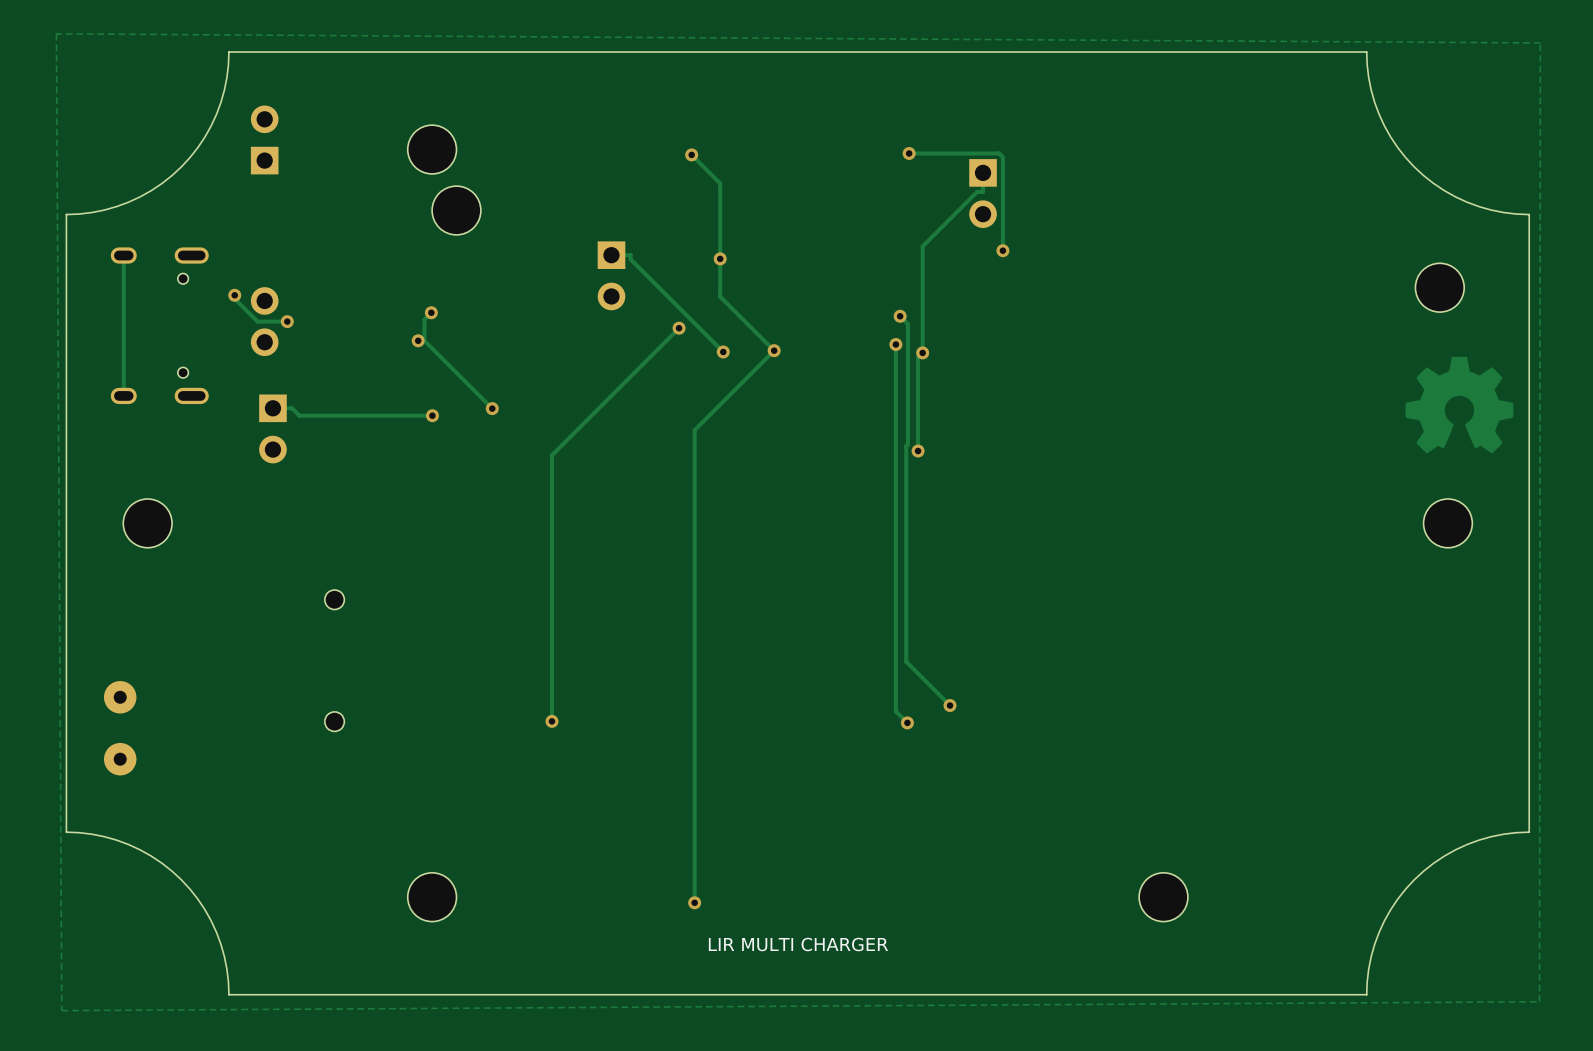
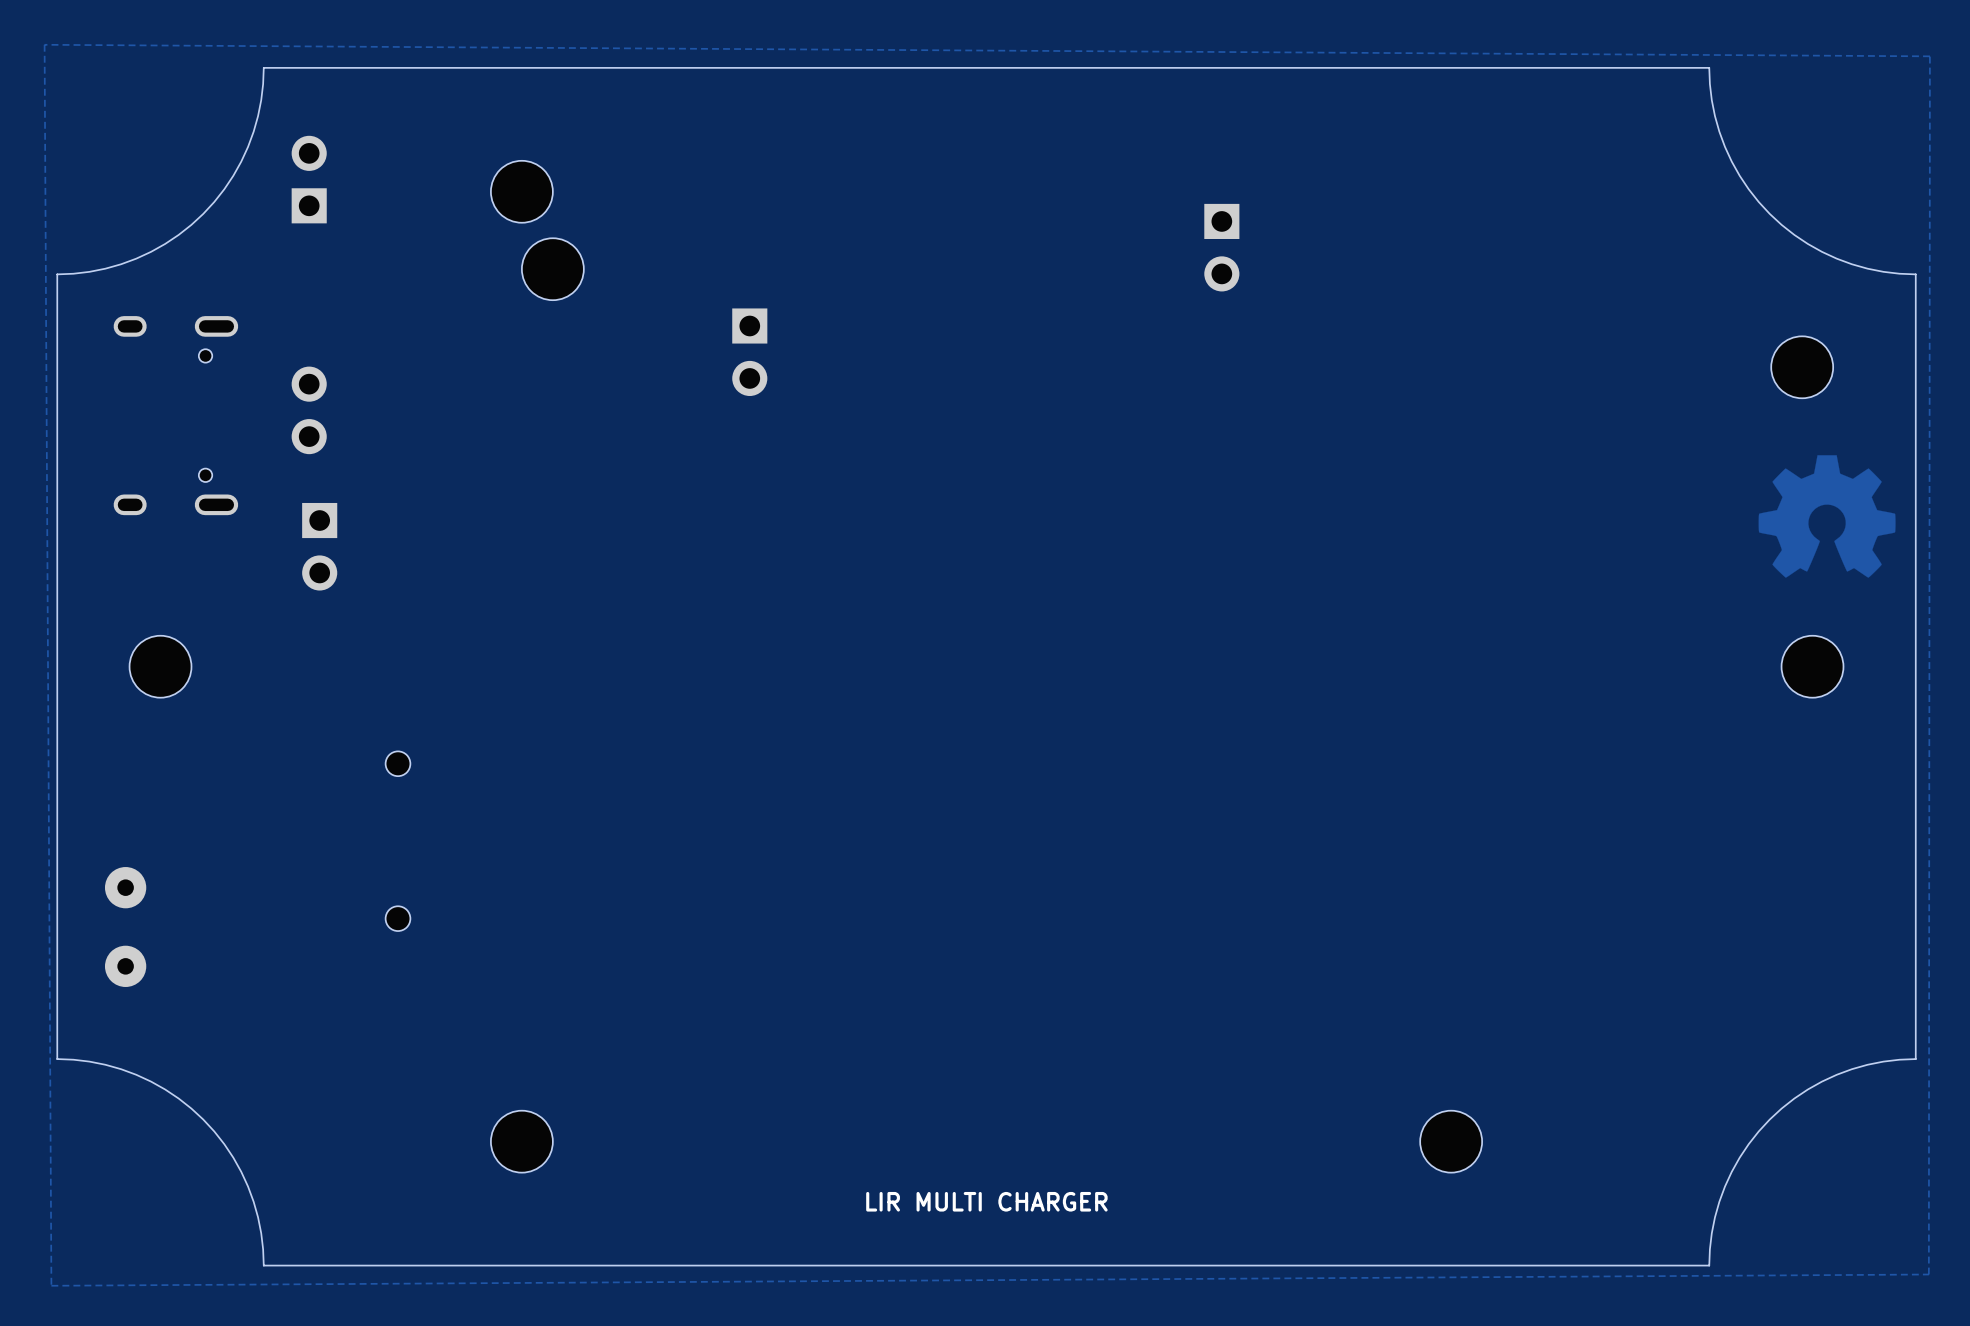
track: (909, 153) (999, 153) (1002, 157) (1002, 250) -> none
via: (909, 153) -> none
track: (691, 154) (720, 183) (720, 296) (774, 350) (694, 430) (694, 902) -> none
via: (691, 154) -> none
track: (983, 172) (983, 192) (977, 192) (922, 246) (922, 352) (918, 357) (918, 451) -> none
via: (1002, 250) -> none
track: (123, 255) (123, 395) -> none
track: (611, 255) (630, 255) (630, 259) (723, 351) -> none
via: (720, 258) -> none
track: (234, 295) (234, 298) (257, 321) (287, 321) -> none
via: (234, 295) -> none
track: (431, 312) (424, 319) (424, 340) -> none
via: (431, 312) -> none
track: (900, 316) (907, 324) (906, 661) (950, 705) -> none
via: (900, 316) -> none
via: (287, 321) -> none
track: (679, 328) (551, 455) (551, 721) -> none
via: (679, 328) -> none
via: (418, 340) -> none
track: (424, 340) (492, 408) -> none
track: (895, 344) (895, 711) (907, 722) -> none
via: (895, 344) -> none
via: (774, 350) -> none
via: (723, 351) -> none
via: (922, 352) -> none
track: (272, 408) (292, 408) (299, 415) (432, 415) -> none
via: (492, 408) -> none
via: (432, 415) -> none
via: (918, 451) -> none
via: (950, 705) -> none
via: (551, 721) -> none
via: (907, 722) -> none
via: (694, 902) -> none

